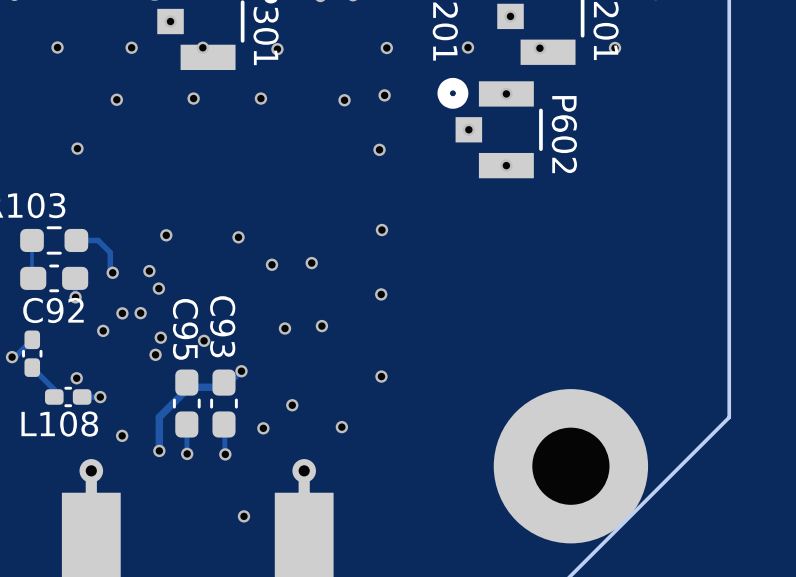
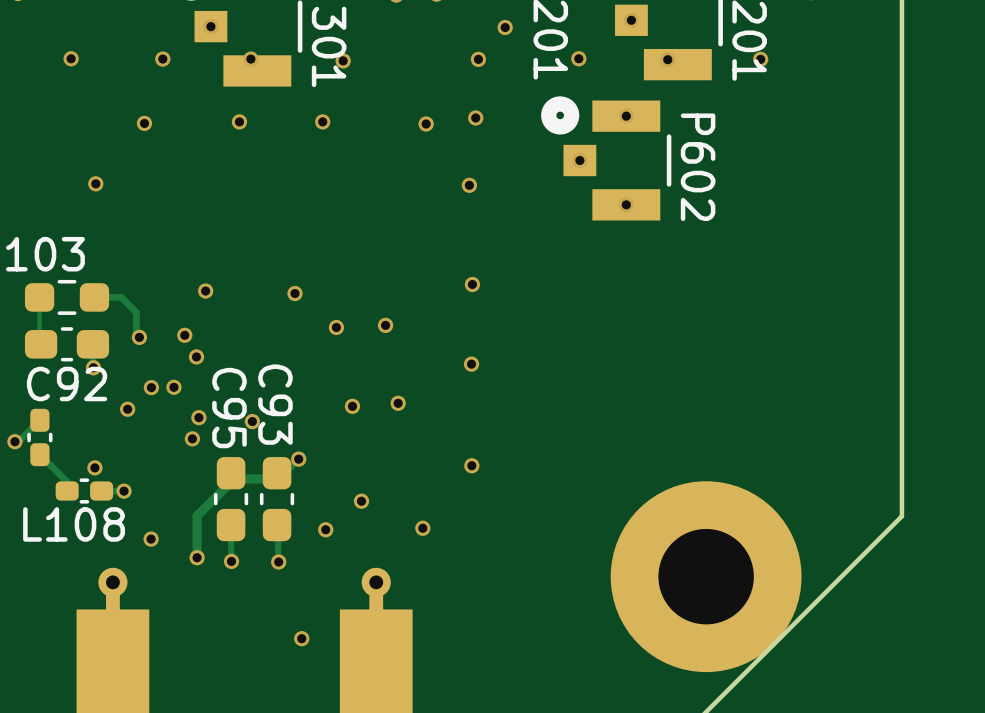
via: none -> (505, 27)

